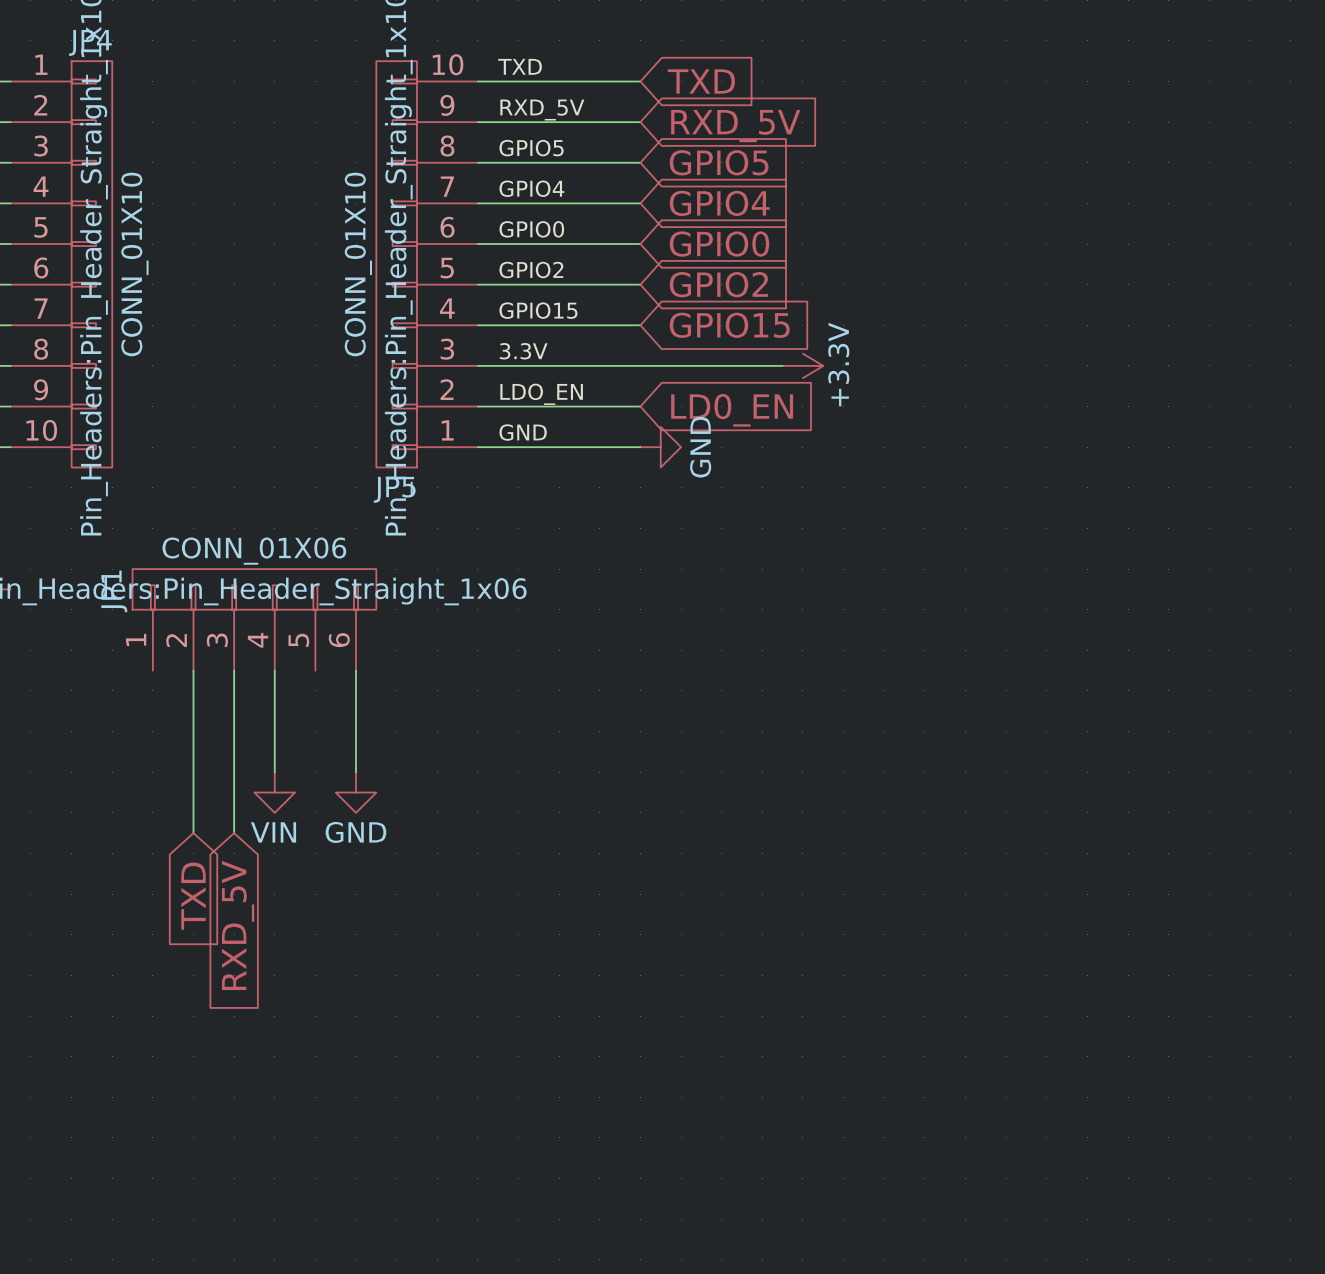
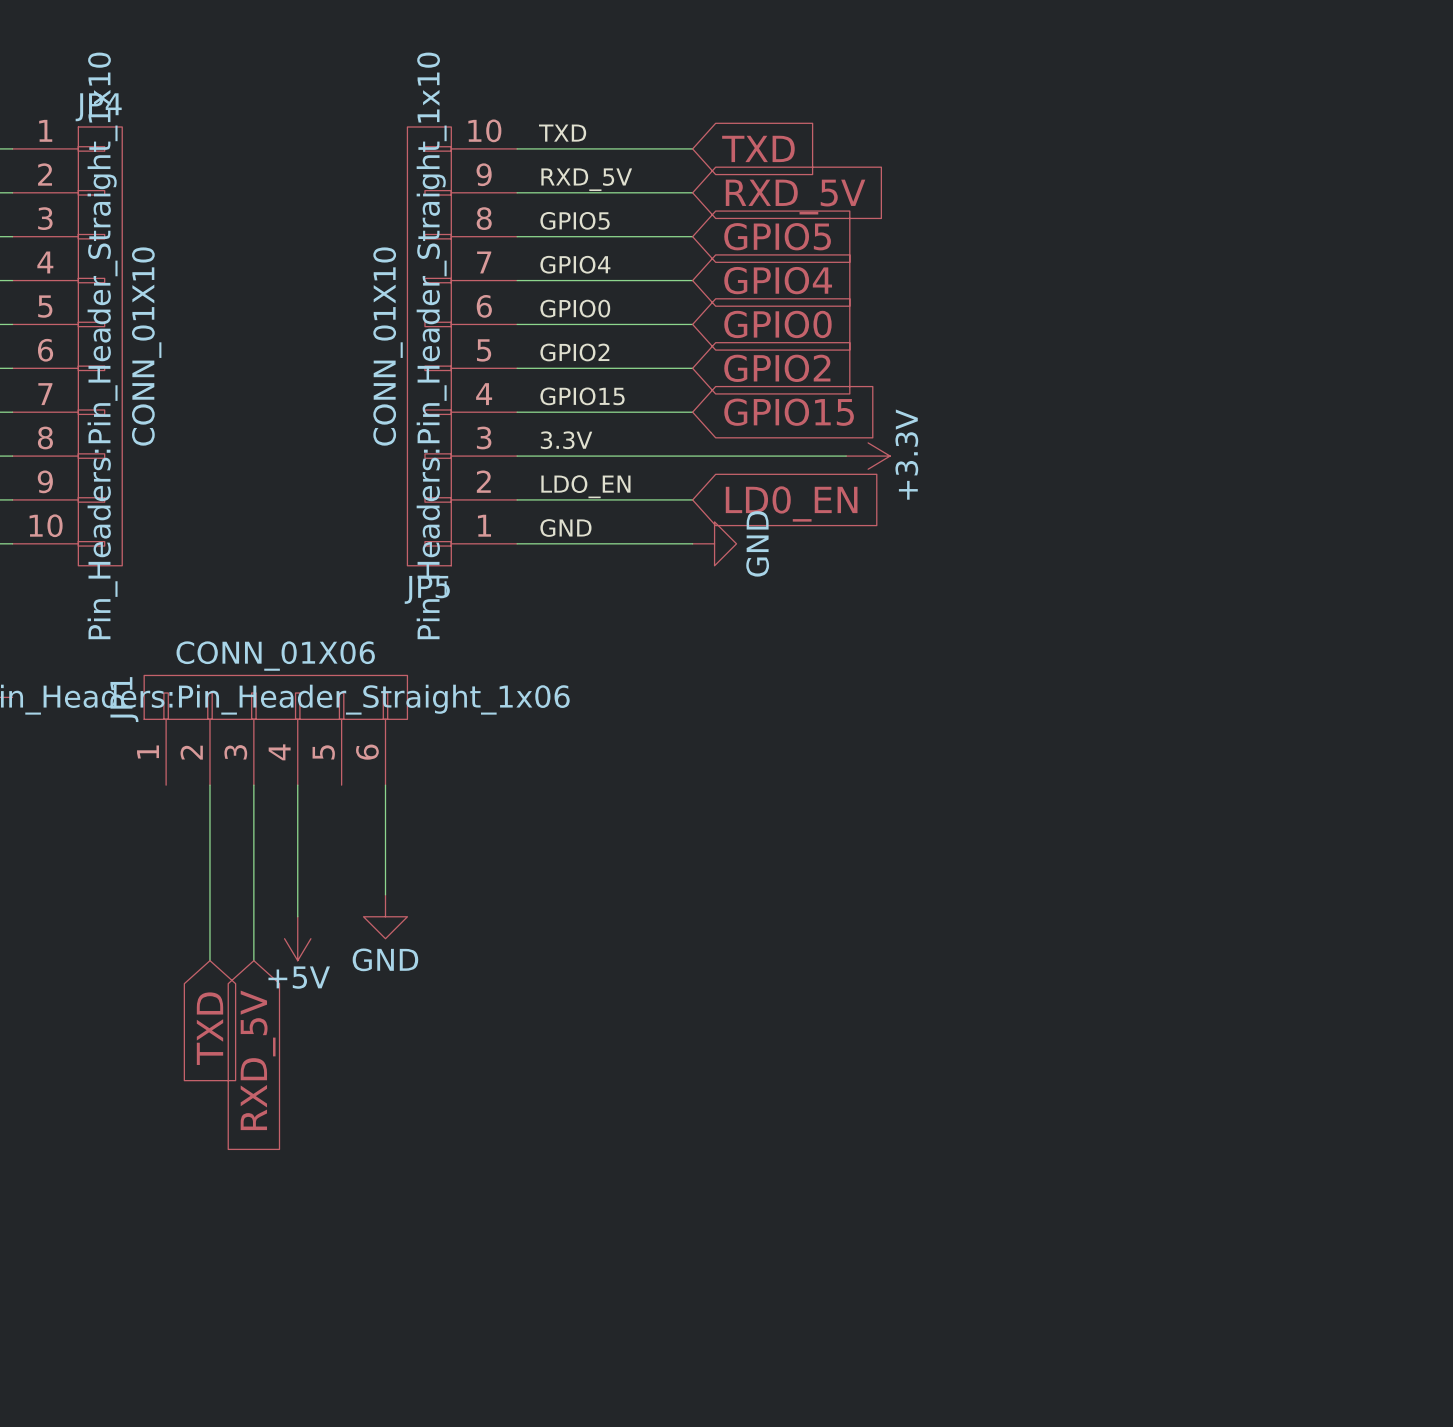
power symbol: VIN (274, 792) -> none
power symbol: none -> +5V (297, 938)

